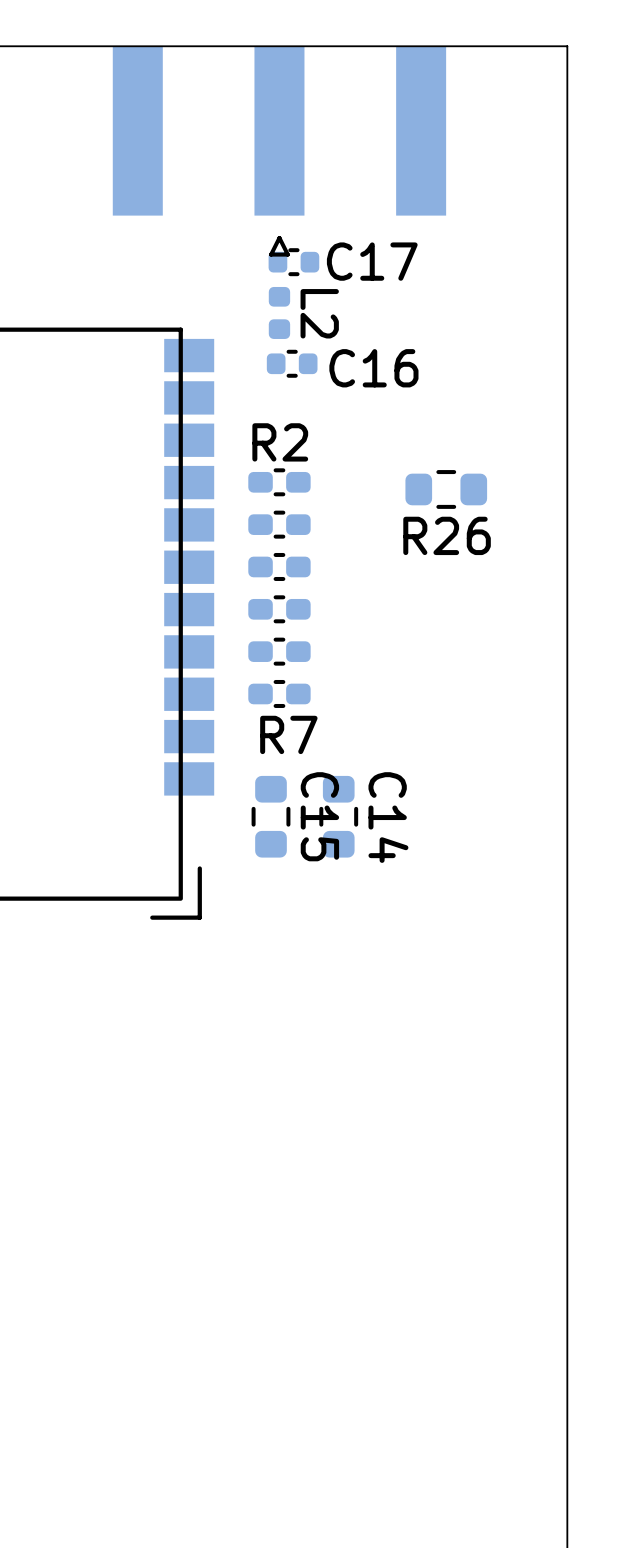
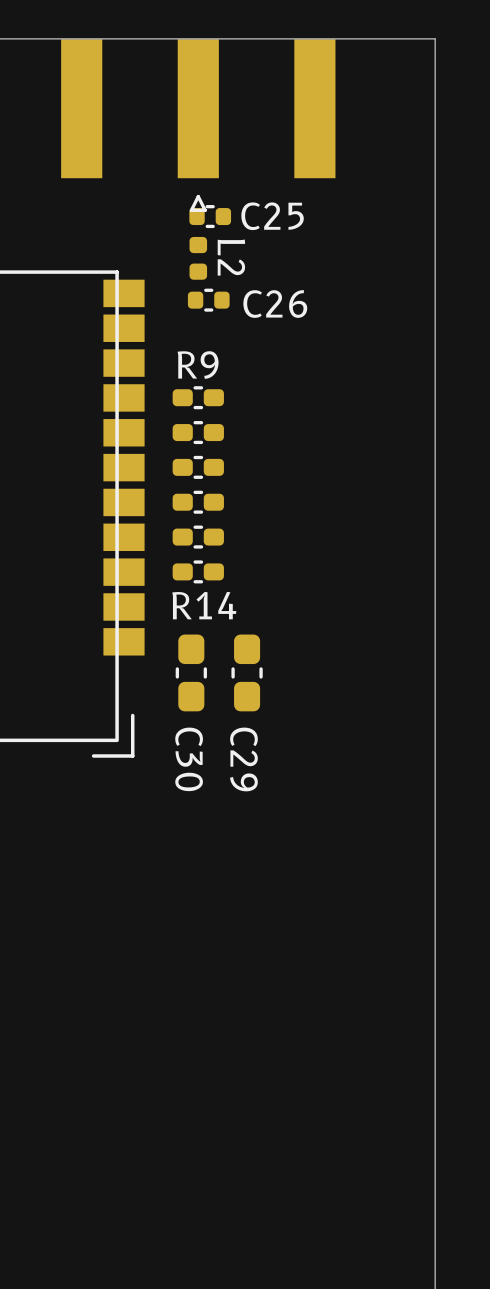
C17 name: C17 (372, 261) -> C25 (272, 216)
C16 name: C16 (373, 368) -> C26 (275, 304)
R2 name: R2 (280, 442) -> R9 (198, 365)
R26: (446, 489) -> none
R7 name: R7 (288, 734) -> R14 (204, 605)
C15: (271, 816) -> none
C30: none -> (191, 672)
C14: (338, 816) -> none
C29: none -> (247, 672)

